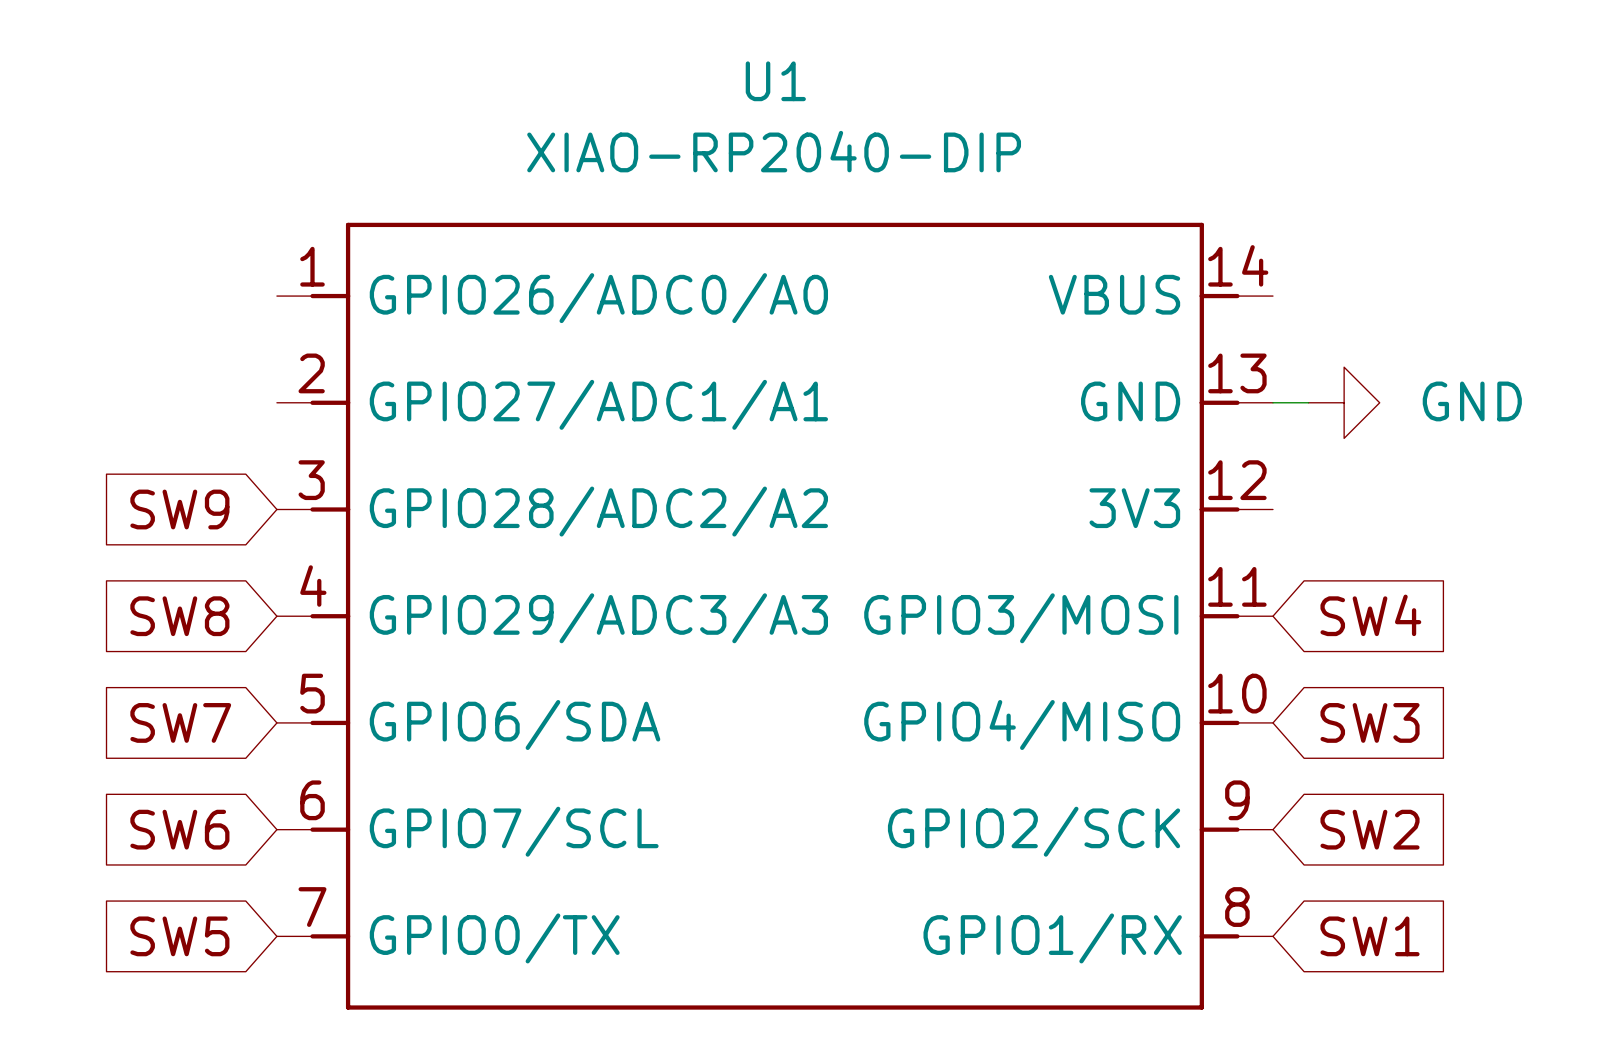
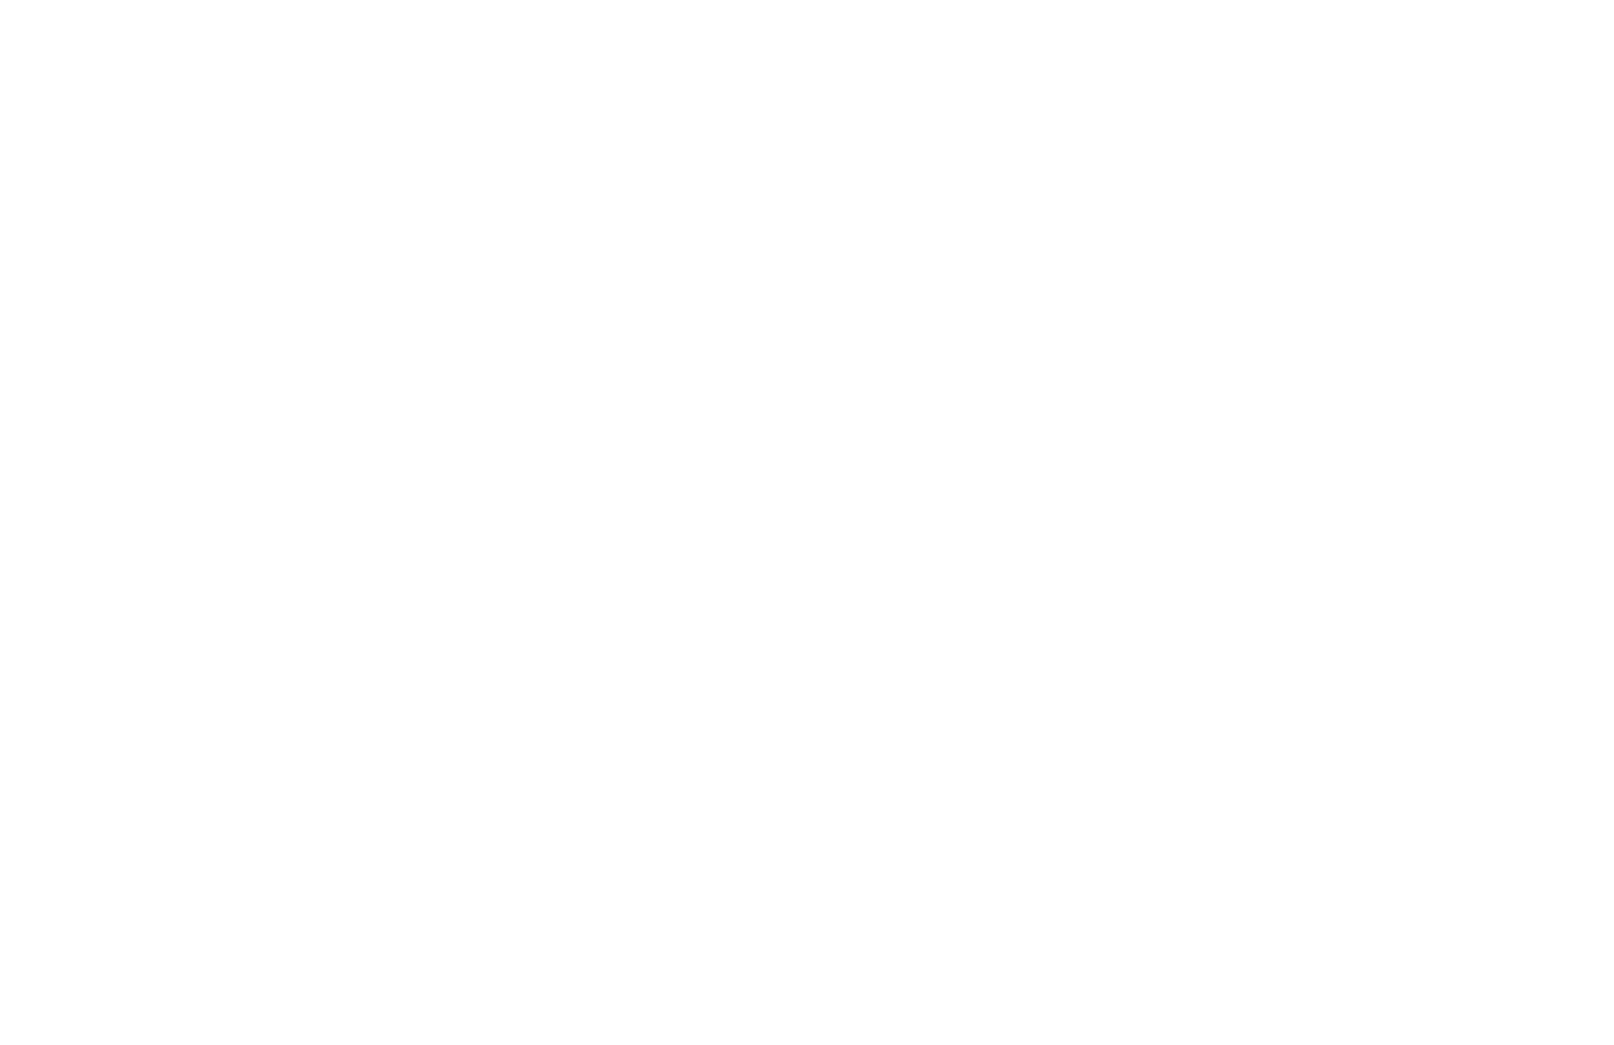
wire: (1272, 402) (1308, 402) -> none
power symbol: GND (1344, 402) -> none
global label: SW9 (179, 509) -> none
global label: SW4 (1370, 615) -> none
global label: SW8 (179, 616) -> none
U1: XIAO-RP2040-DIP (774, 616) -> none
global label: SW7 (180, 722) -> none
global label: SW3 (1370, 722) -> none
global label: SW6 (179, 829) -> none
global label: SW2 (1370, 829) -> none
global label: SW5 (179, 936) -> none
global label: SW1 (1370, 936) -> none

